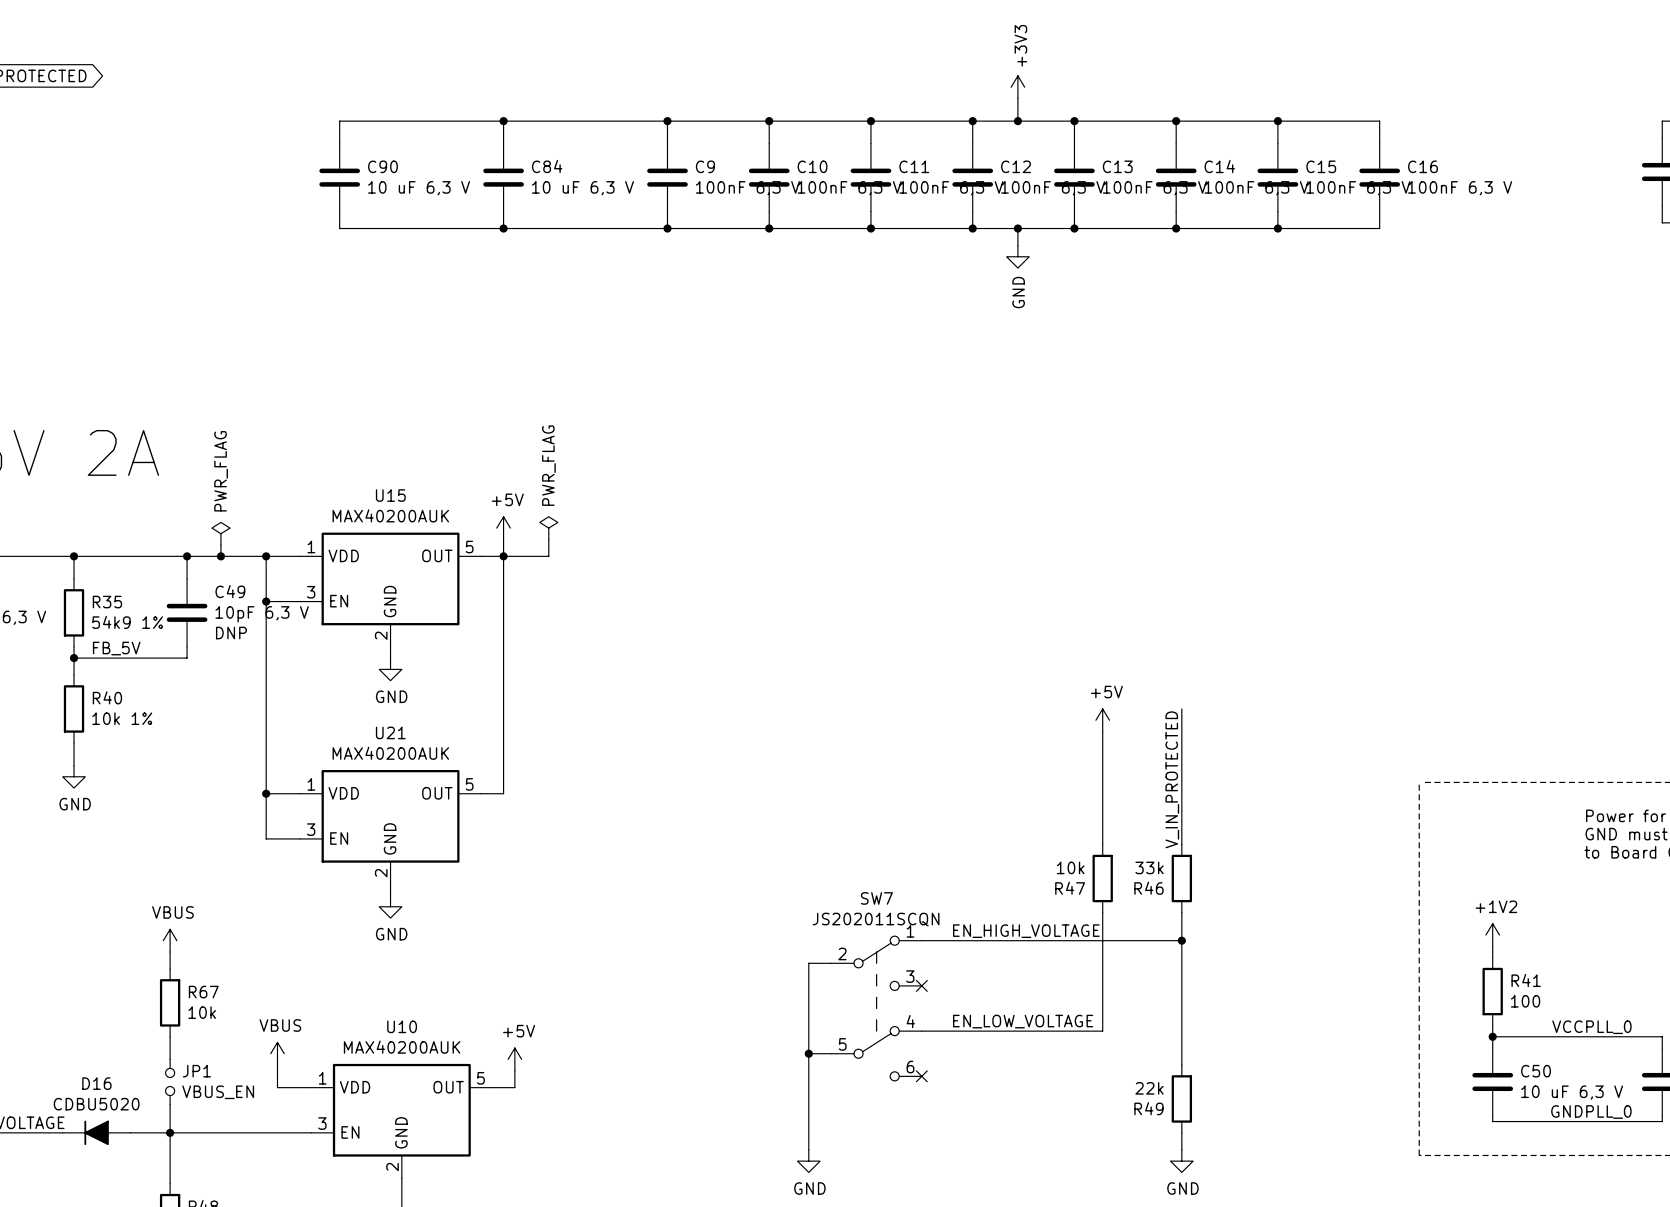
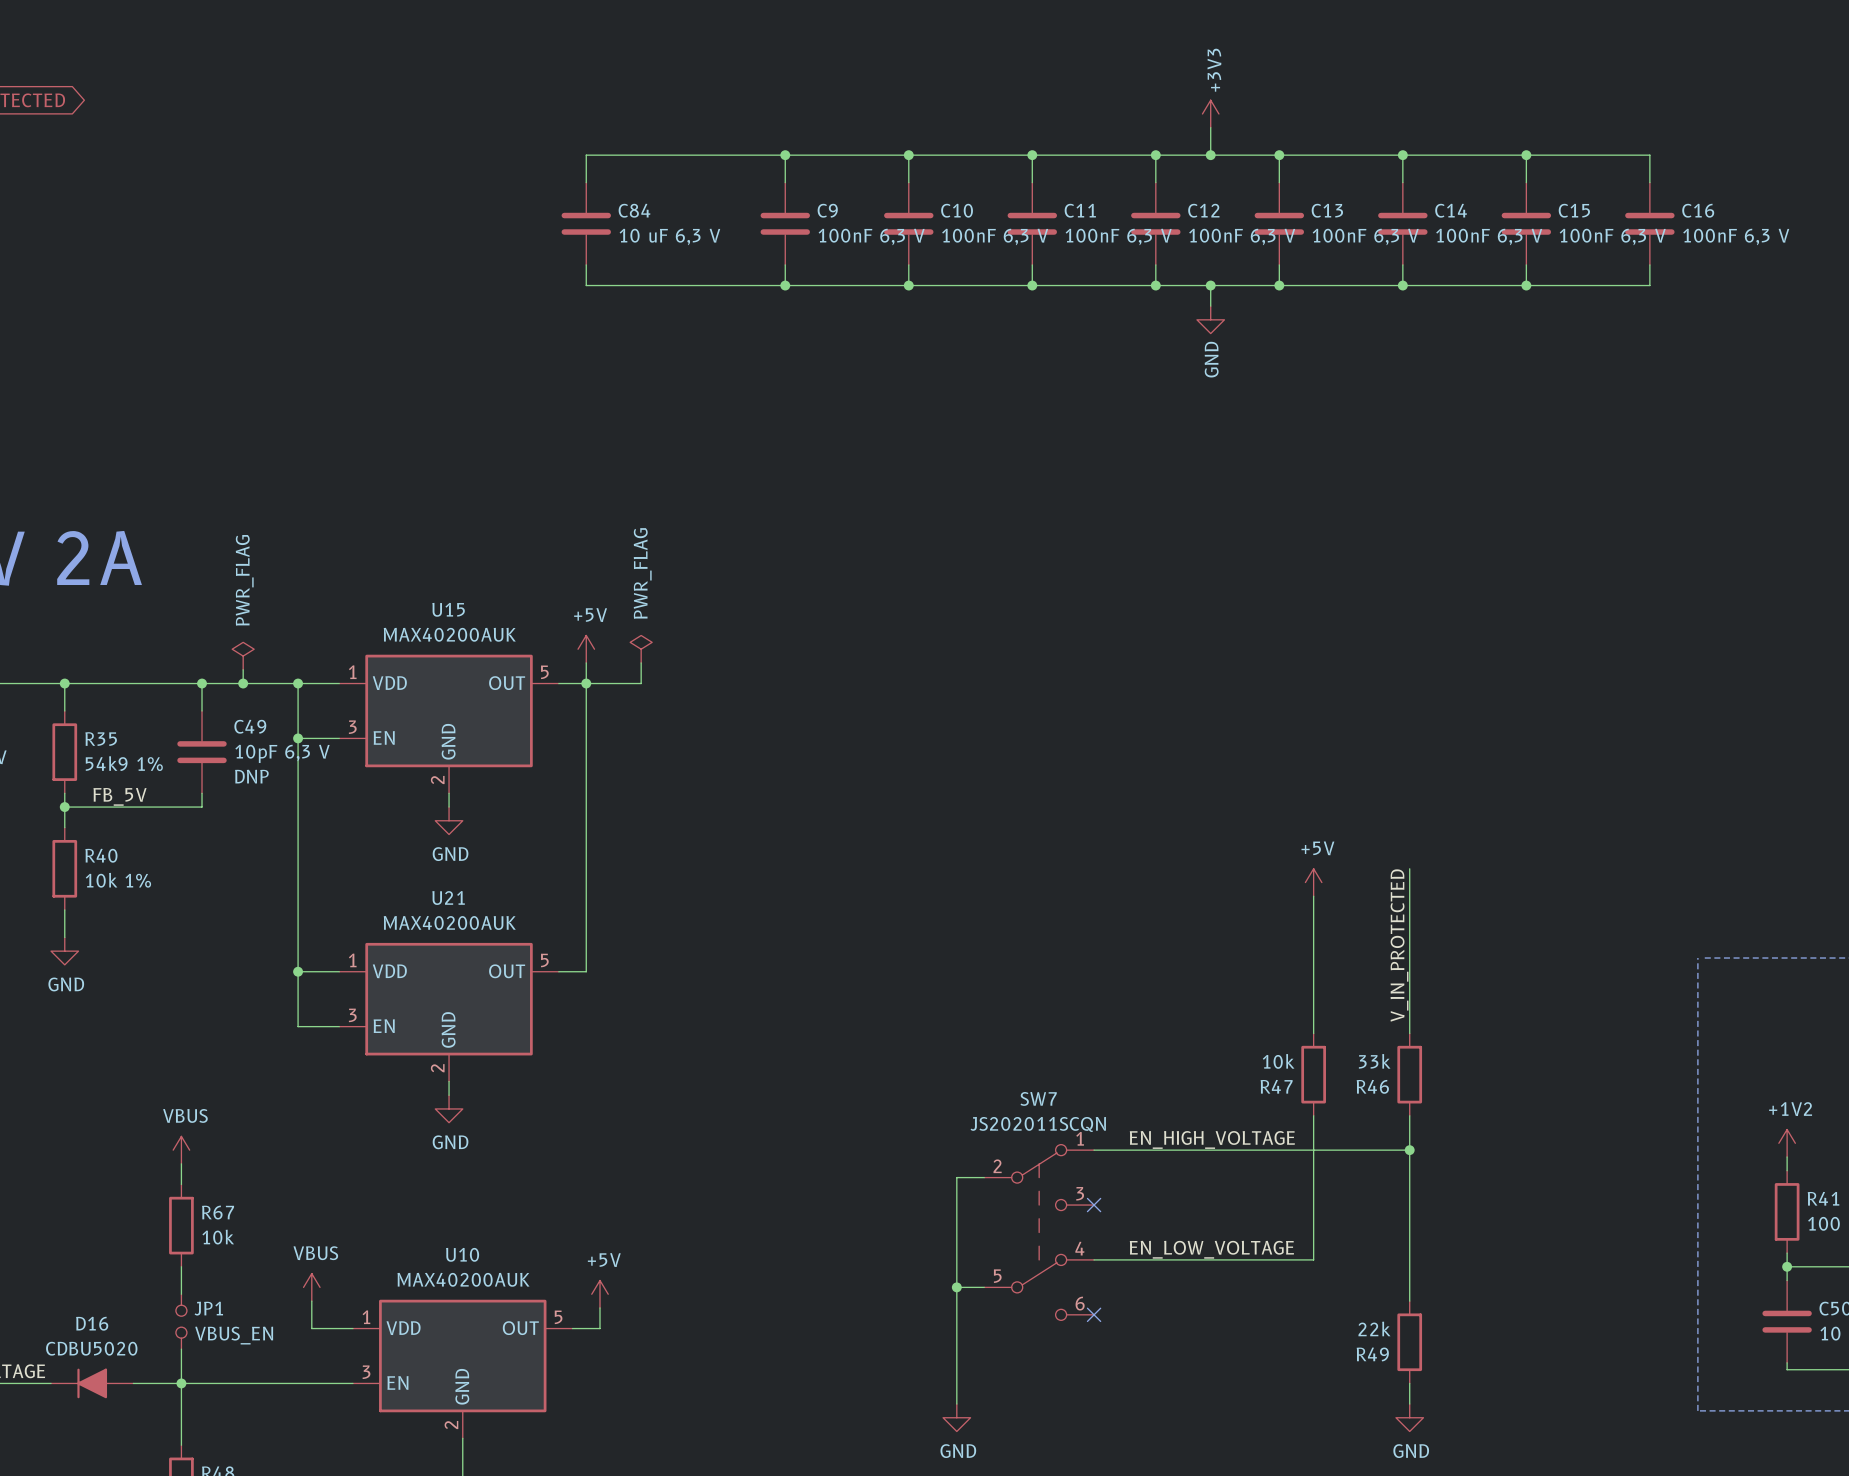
wire: (503, 121) (339, 121) (339, 143) -> none
junction: (503, 121) -> none
C90: 10 uF 6,3 V (339, 177) -> none
wire: (339, 211) (339, 228) (503, 228) -> none
junction: (503, 228) -> none

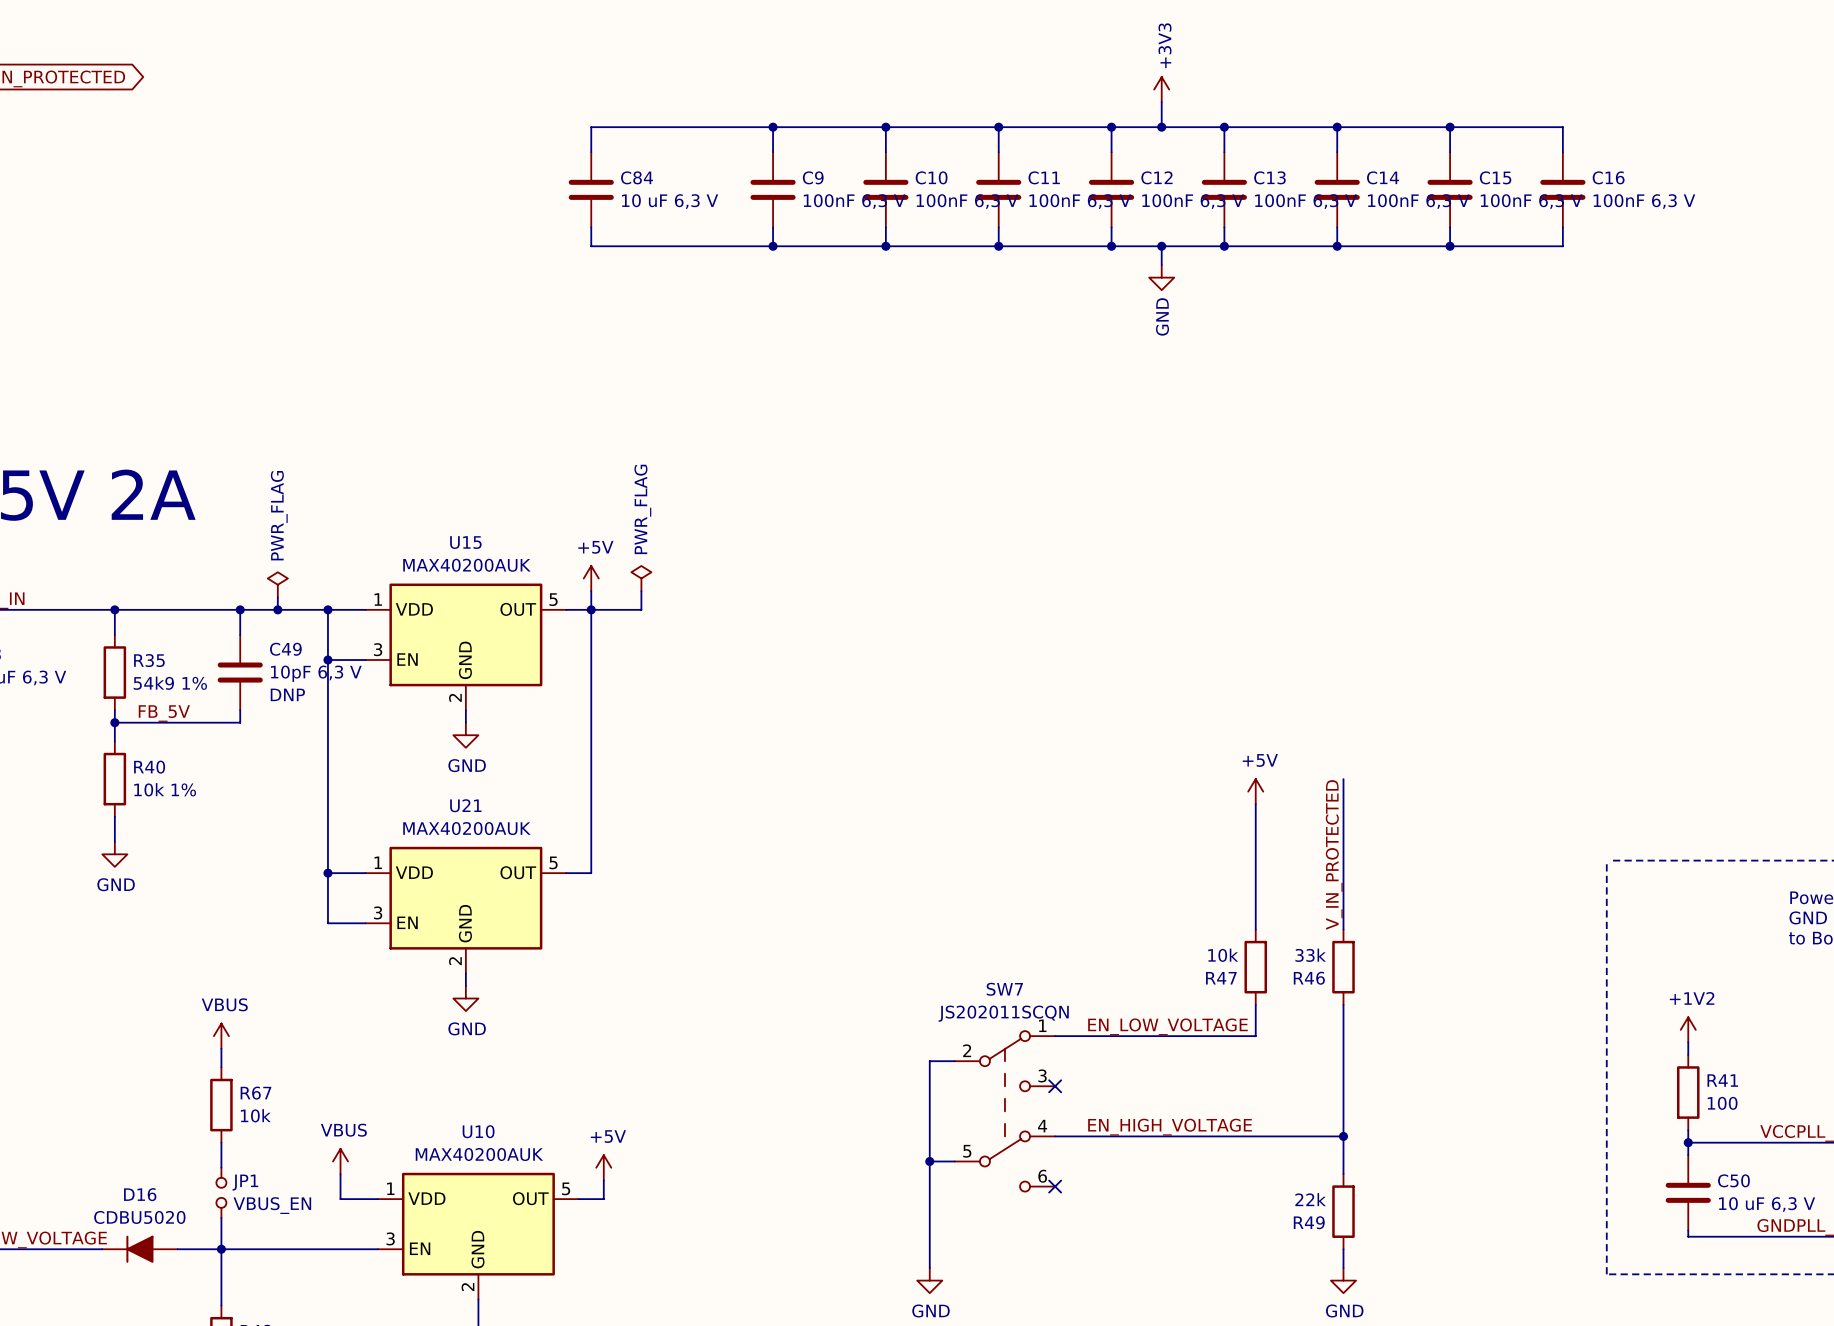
label: EN_HIGH_VOLTAGE (1212, 1139) -> EN_LOW_VOLTAGE (1167, 1026)
wire: (1409, 1150) (1313, 1150) (1313, 1259) -> (1343, 1136) (1255, 1136)
junction: (1409, 1150) -> none
label: EN_LOW_VOLTAGE (1211, 1249) -> EN_HIGH_VOLTAGE (1170, 1127)
junction: none -> (1343, 1136)

